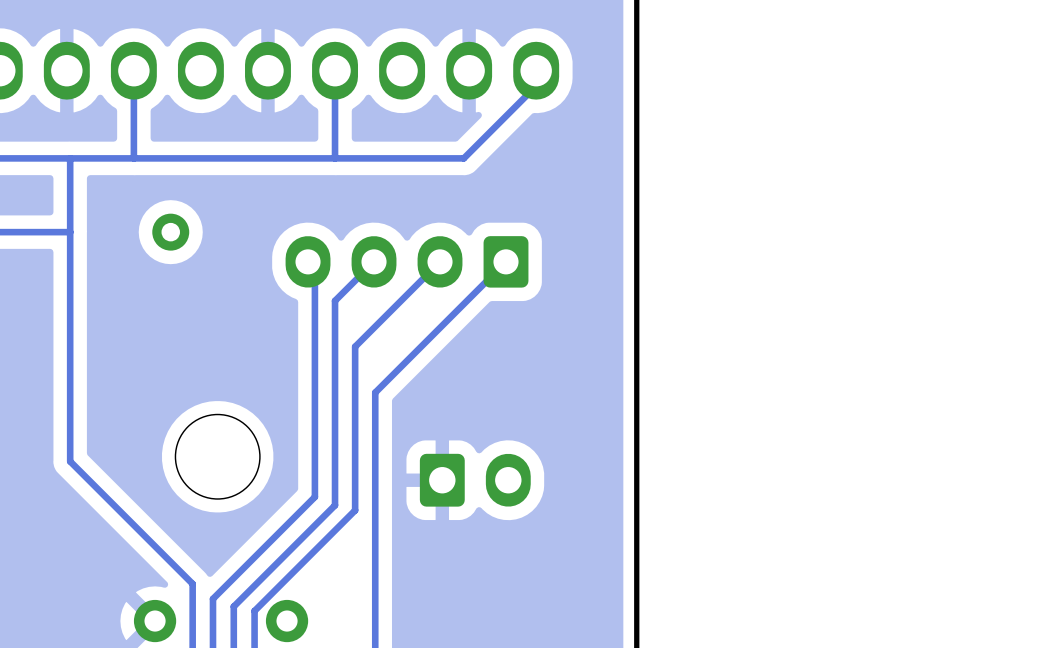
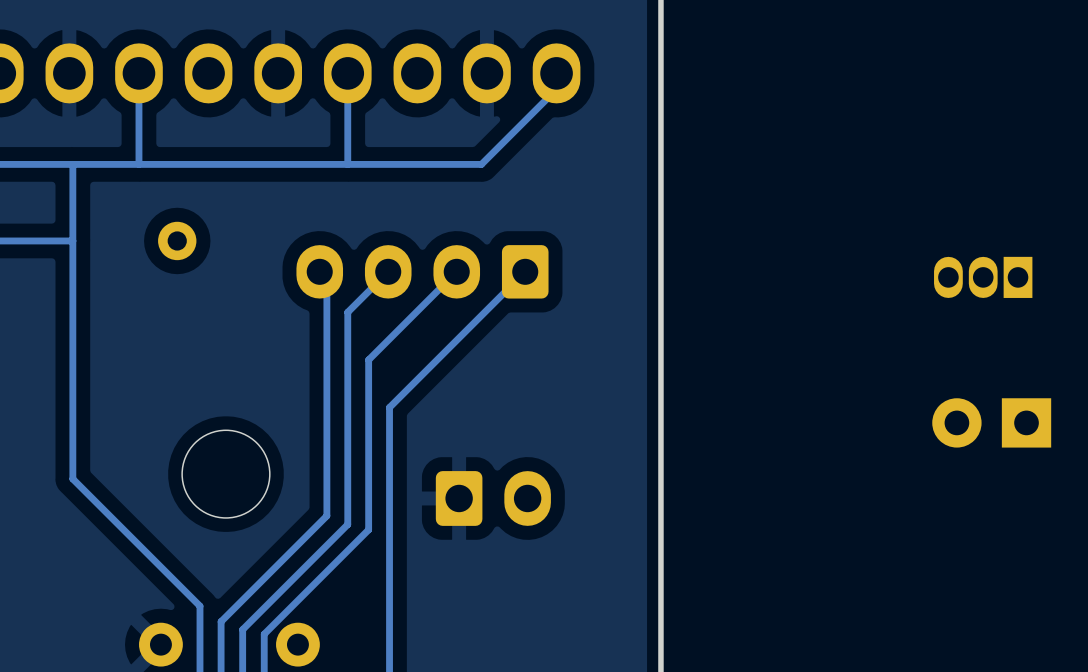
part: none -> (983, 277)
part: none -> (991, 422)

